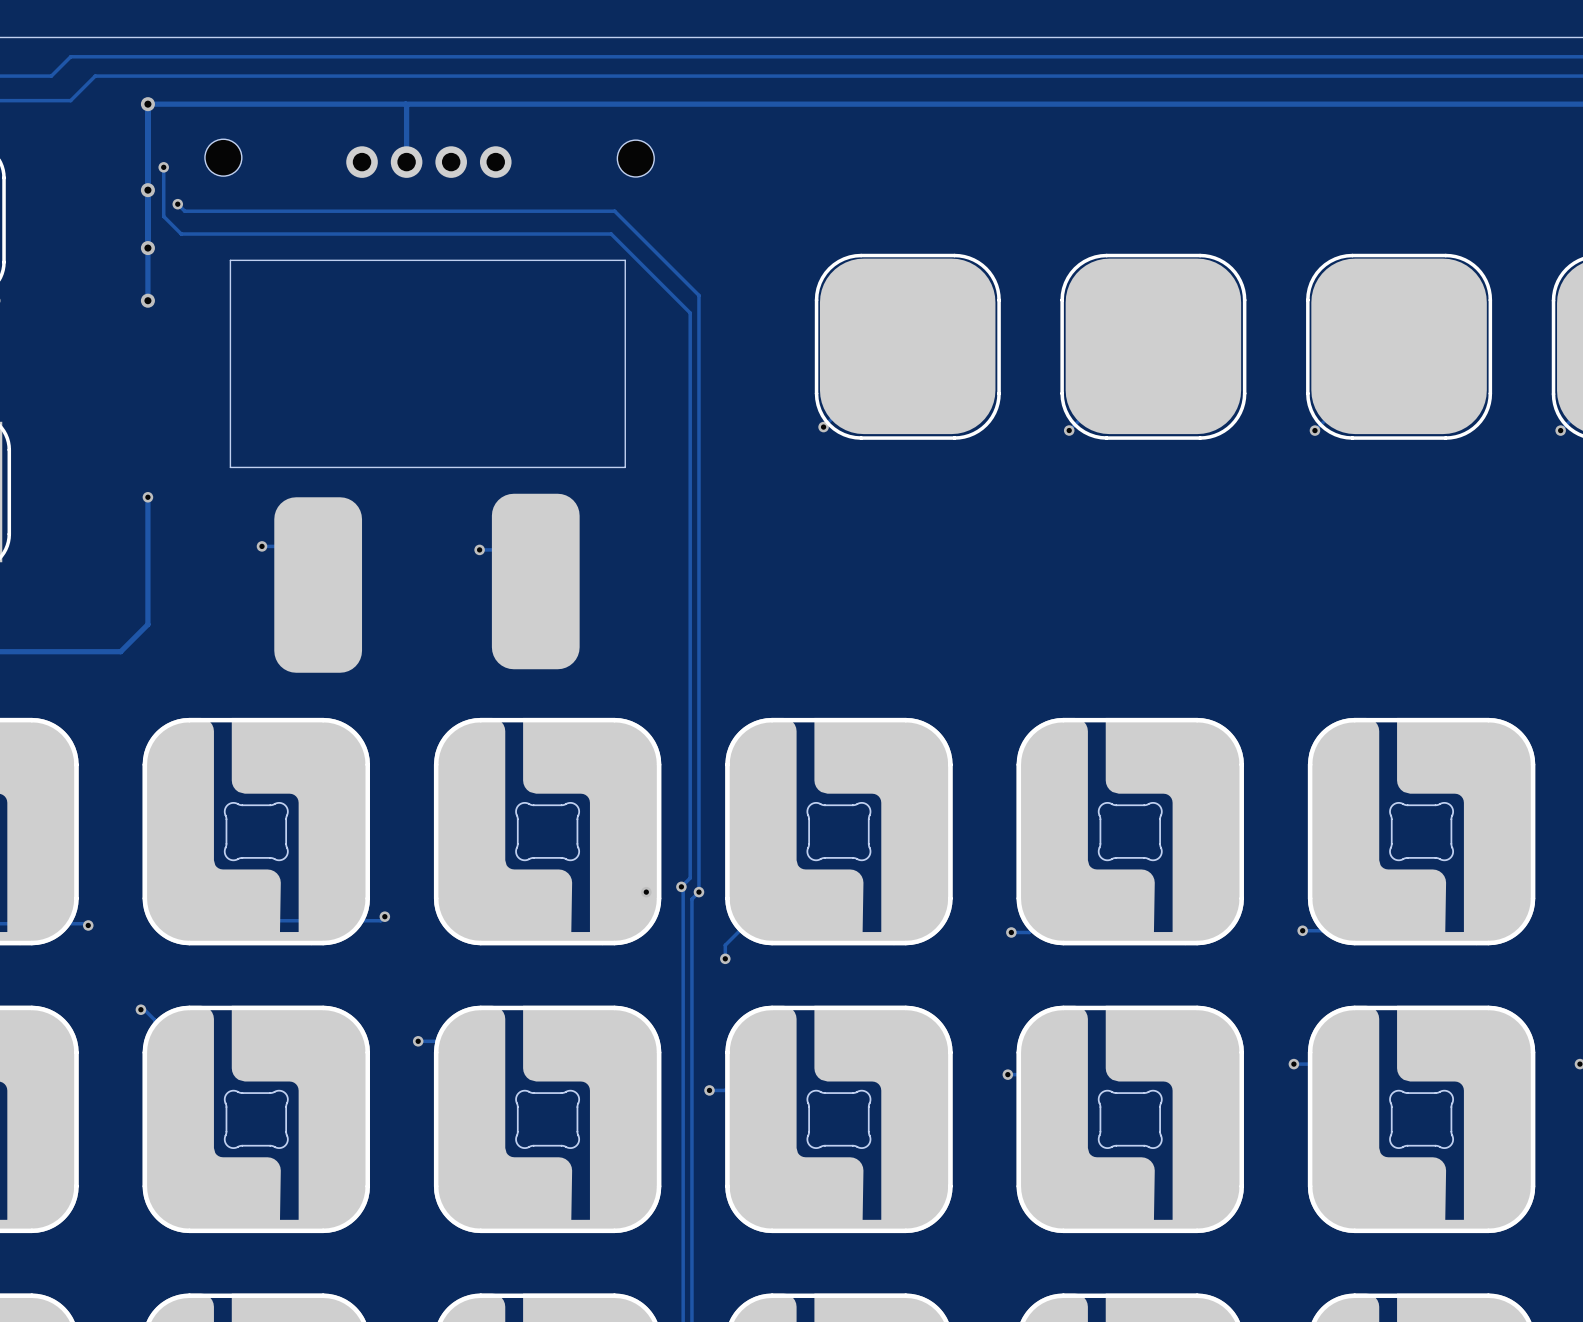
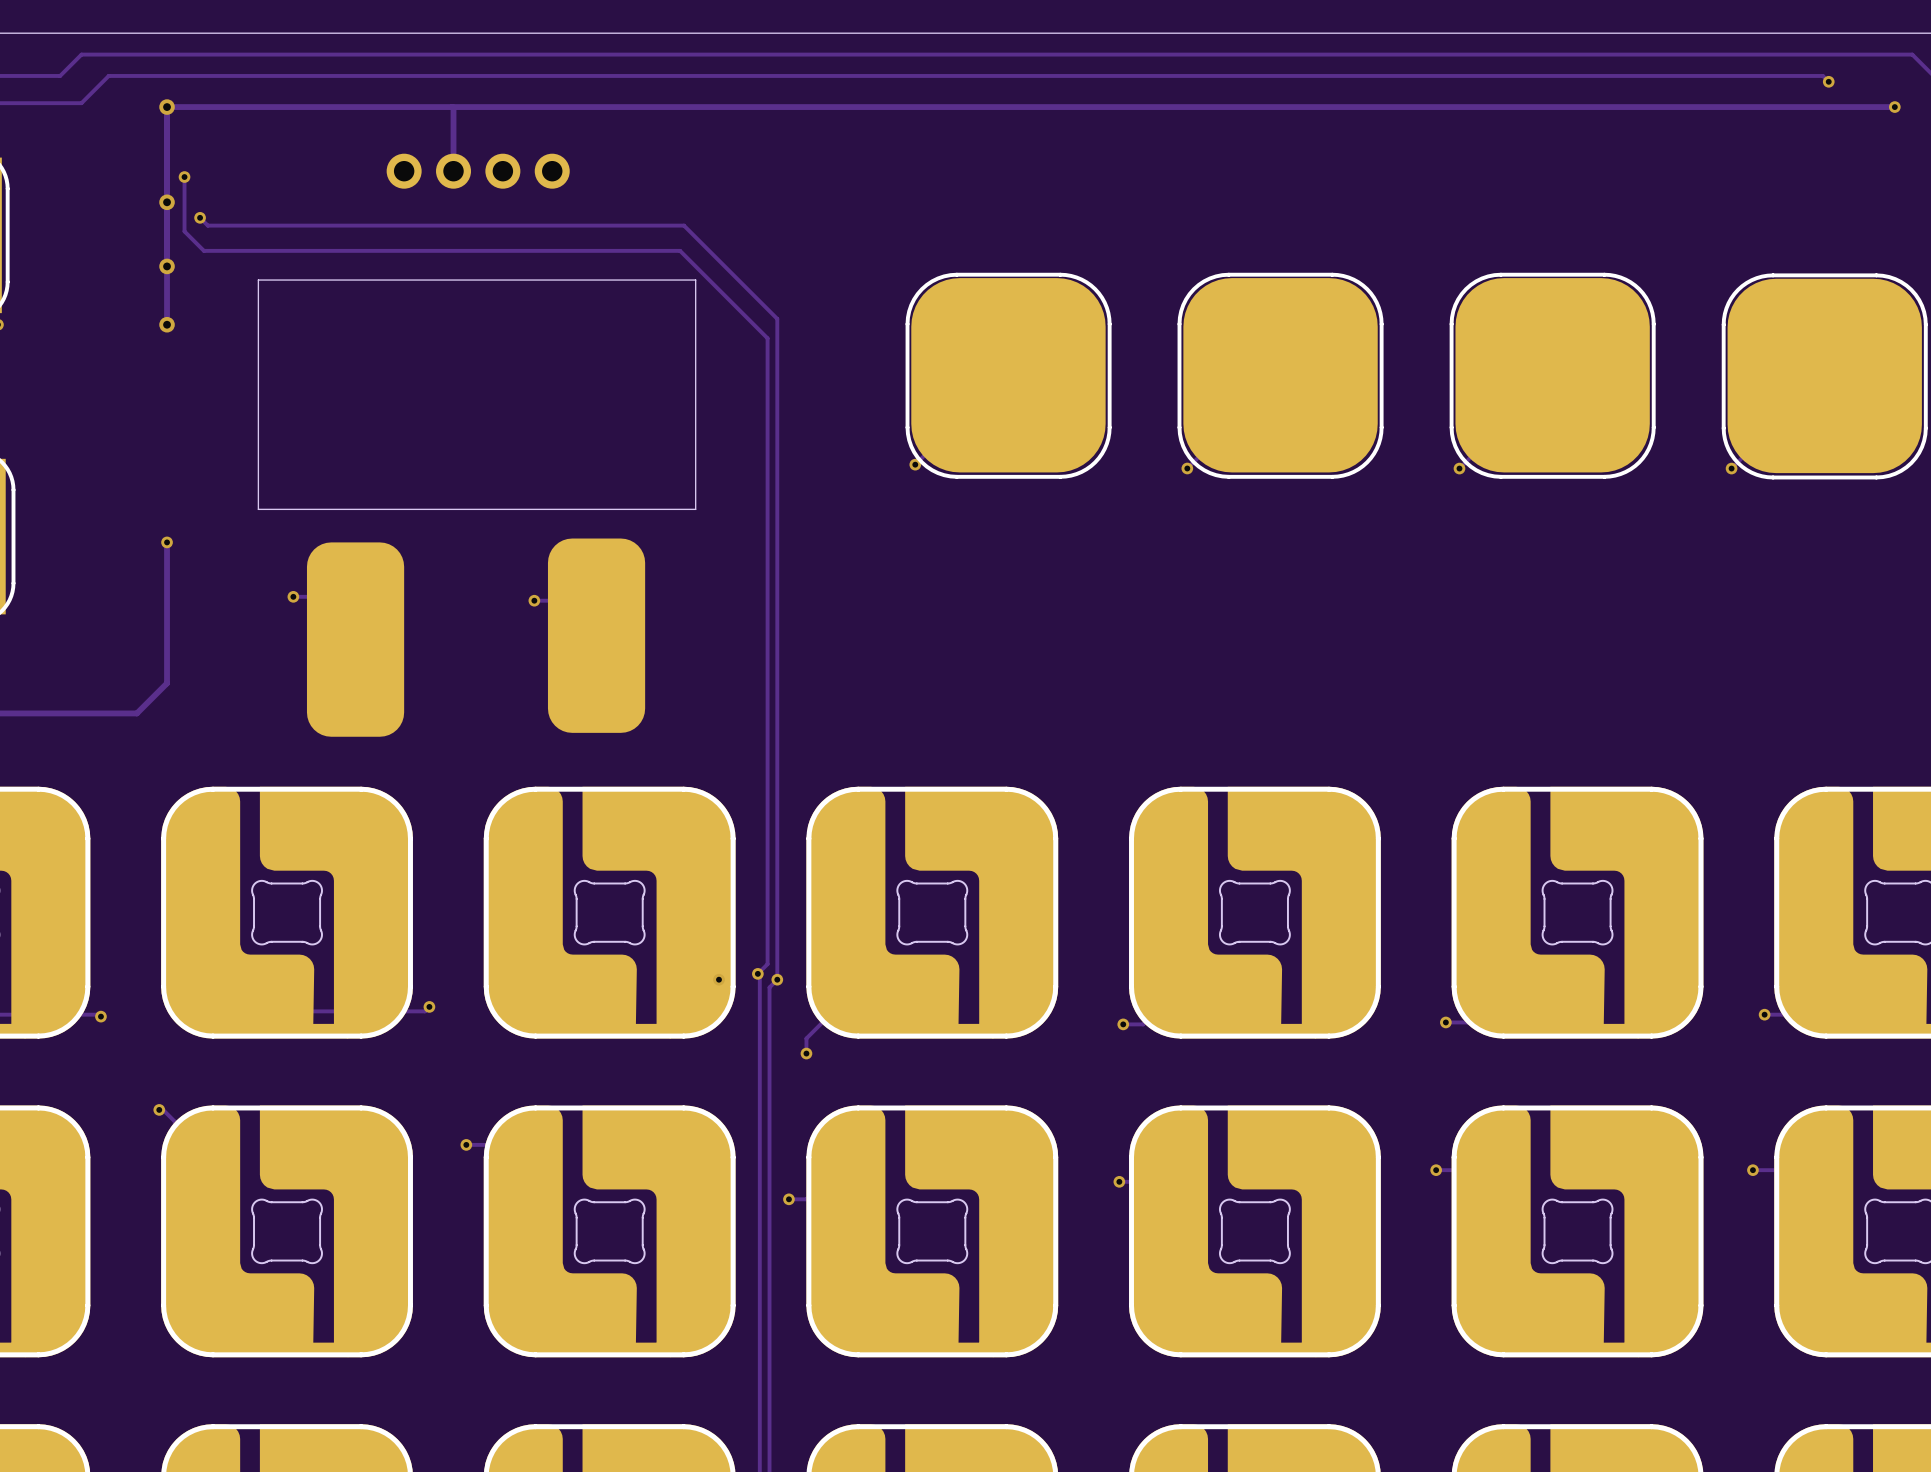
part: (223, 157) -> none
part: (635, 158) -> none

